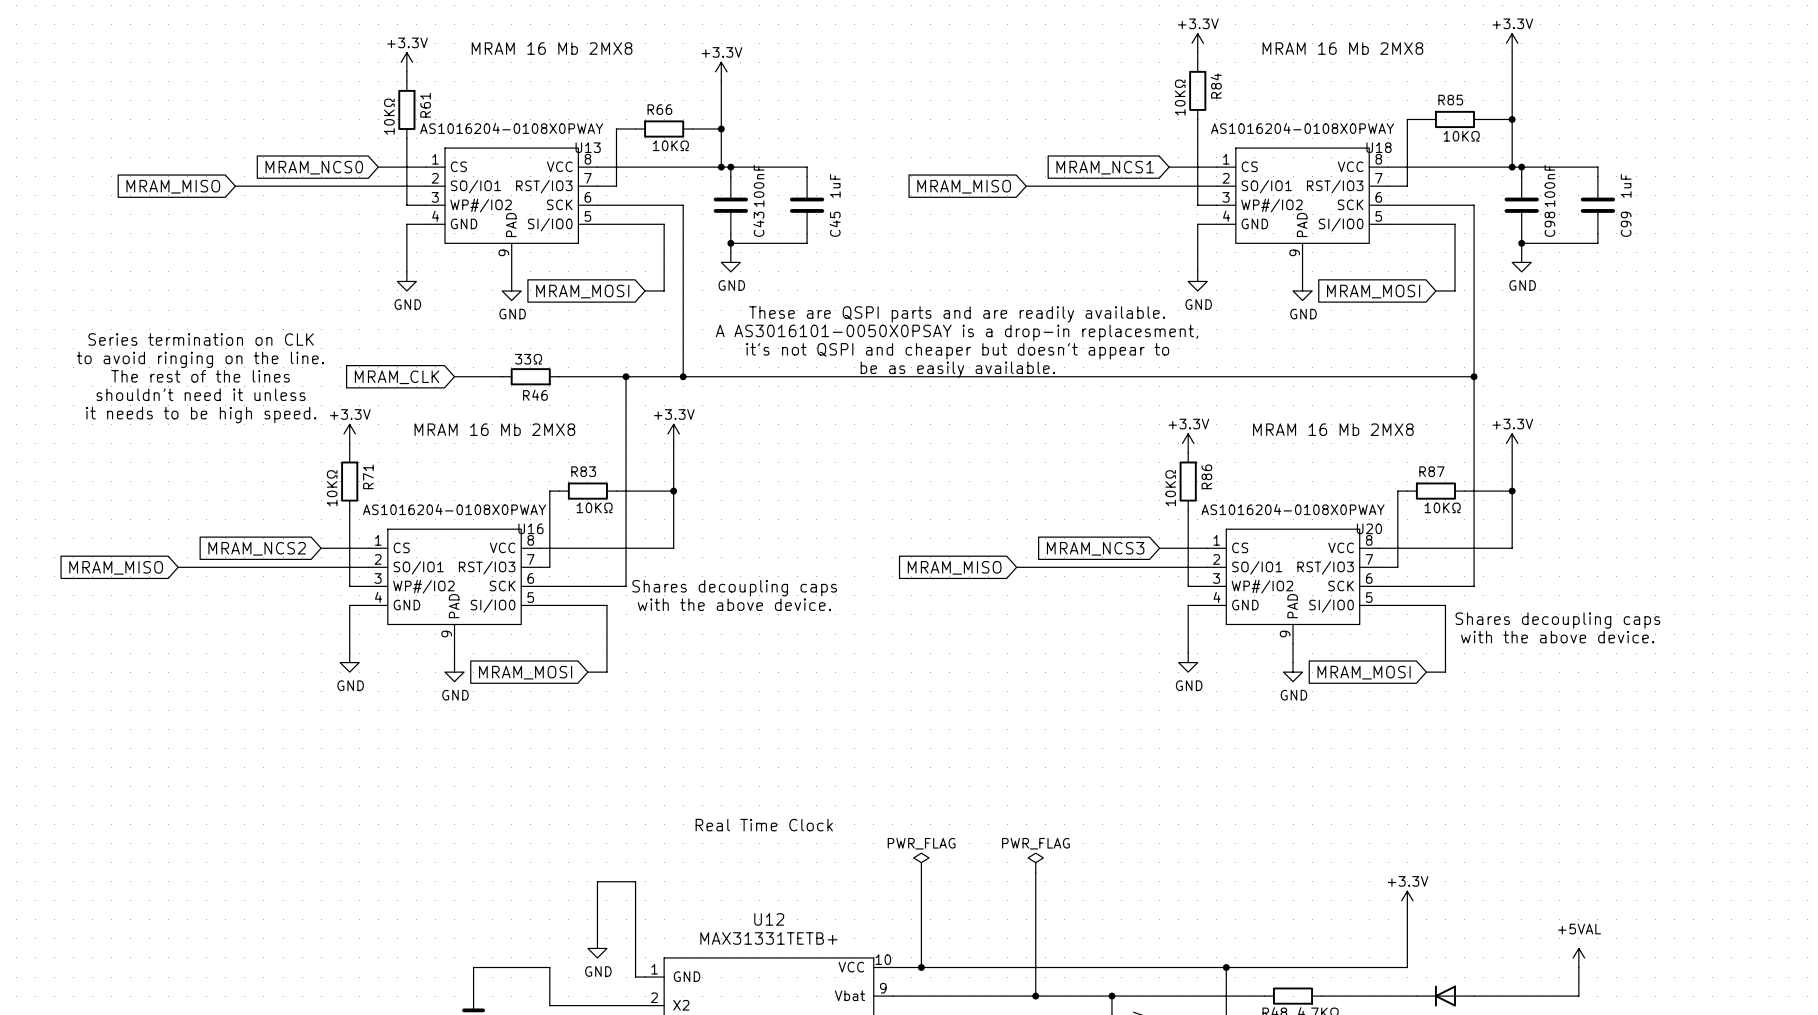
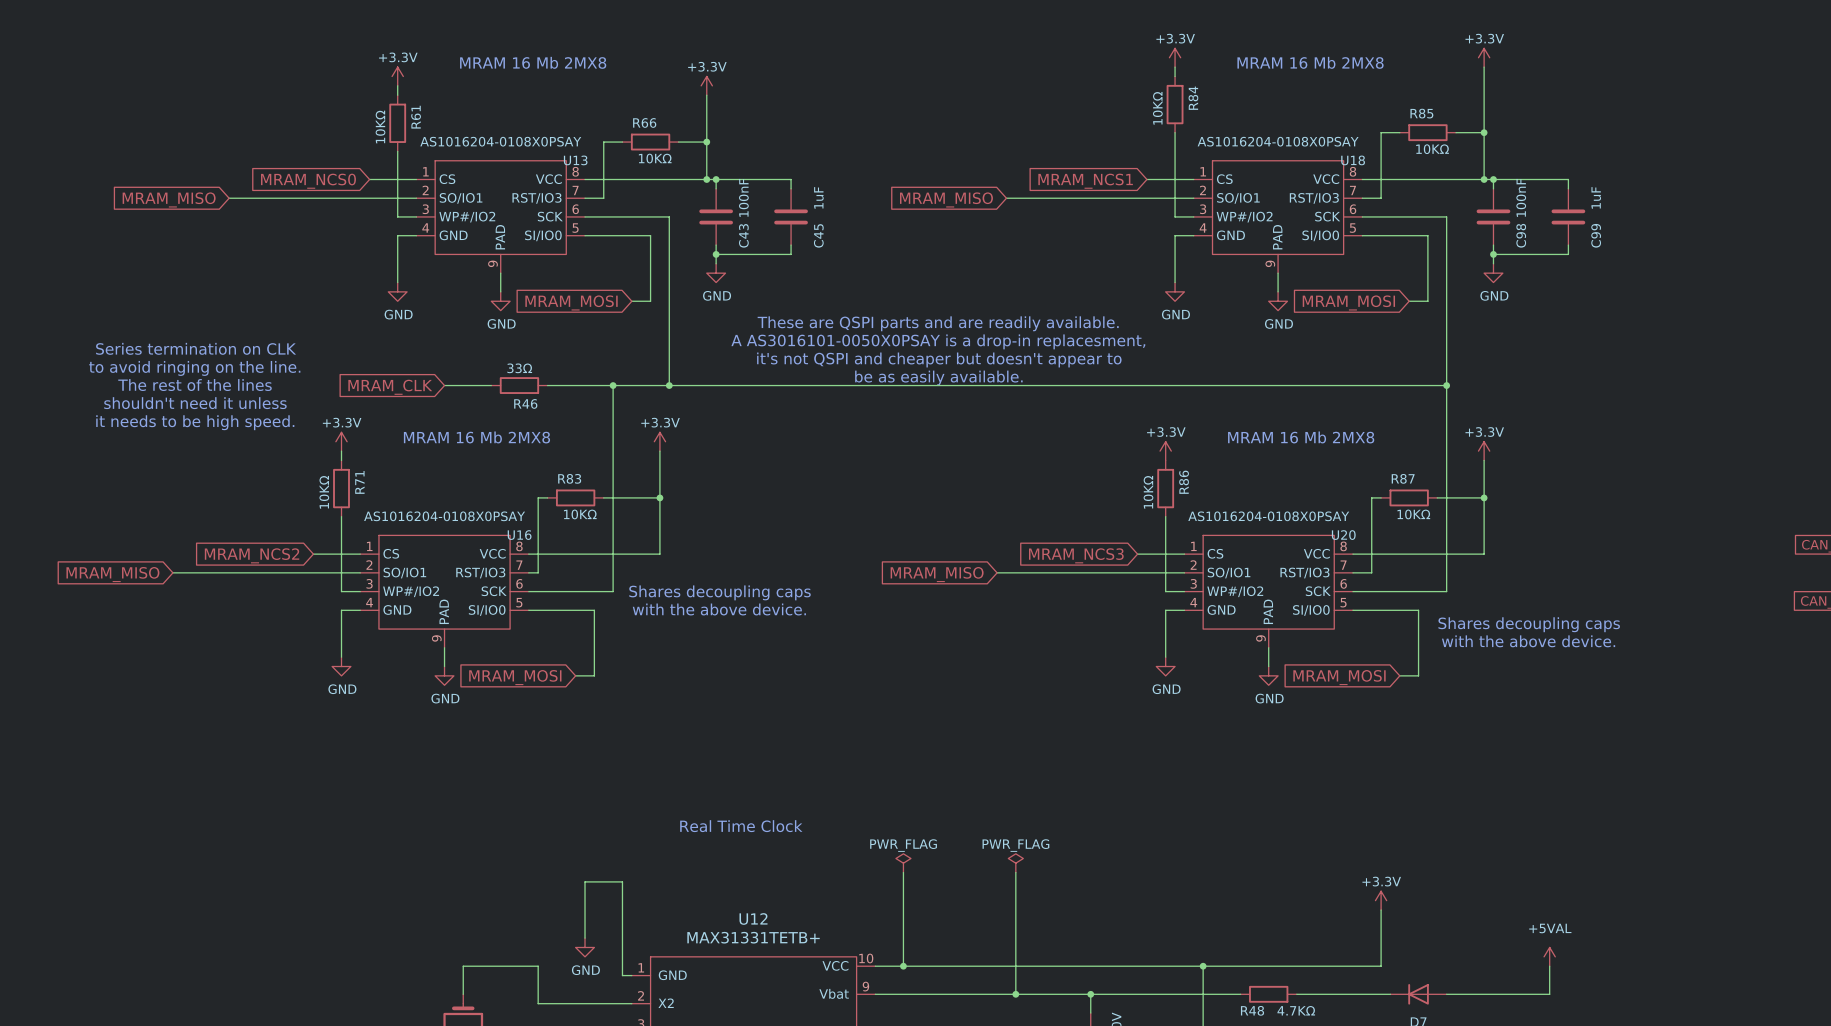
U13 value: AS1016204-0108X0PWAY (511, 128) -> AS1016204-0108X0PSAY (500, 141)
U18 value: AS1016204-0108X0PWAY (1302, 128) -> AS1016204-0108X0PSAY (1278, 141)
U16 value: AS1016204-0108X0PWAY (454, 509) -> AS1016204-0108X0PSAY (444, 516)
U20 value: AS1016204-0108X0PWAY (1293, 509) -> AS1016204-0108X0PSAY (1268, 516)

